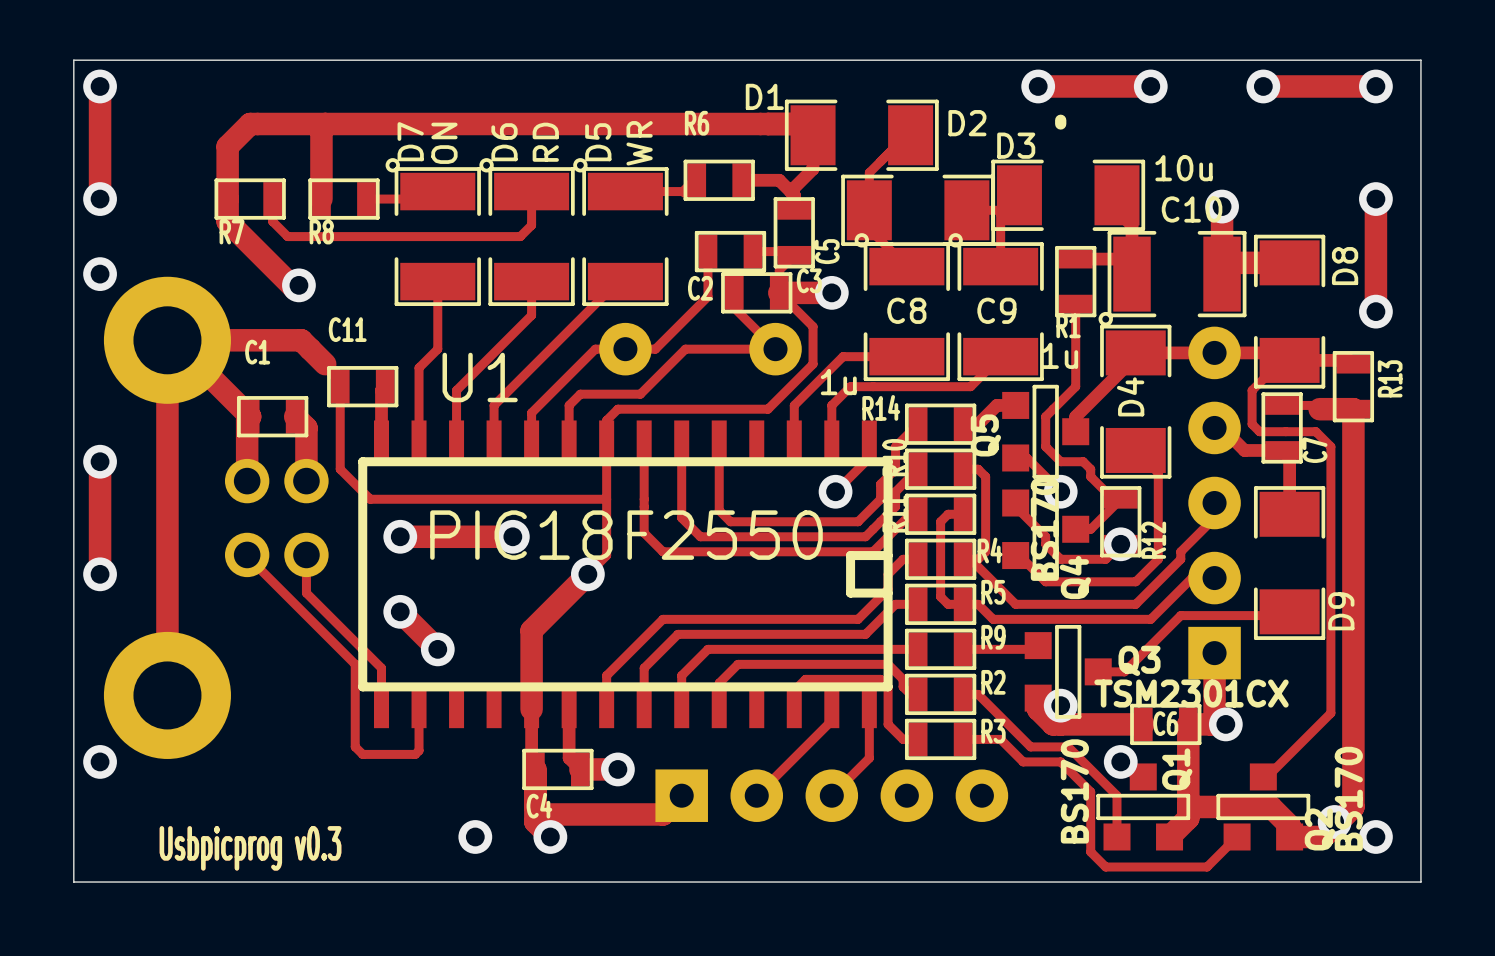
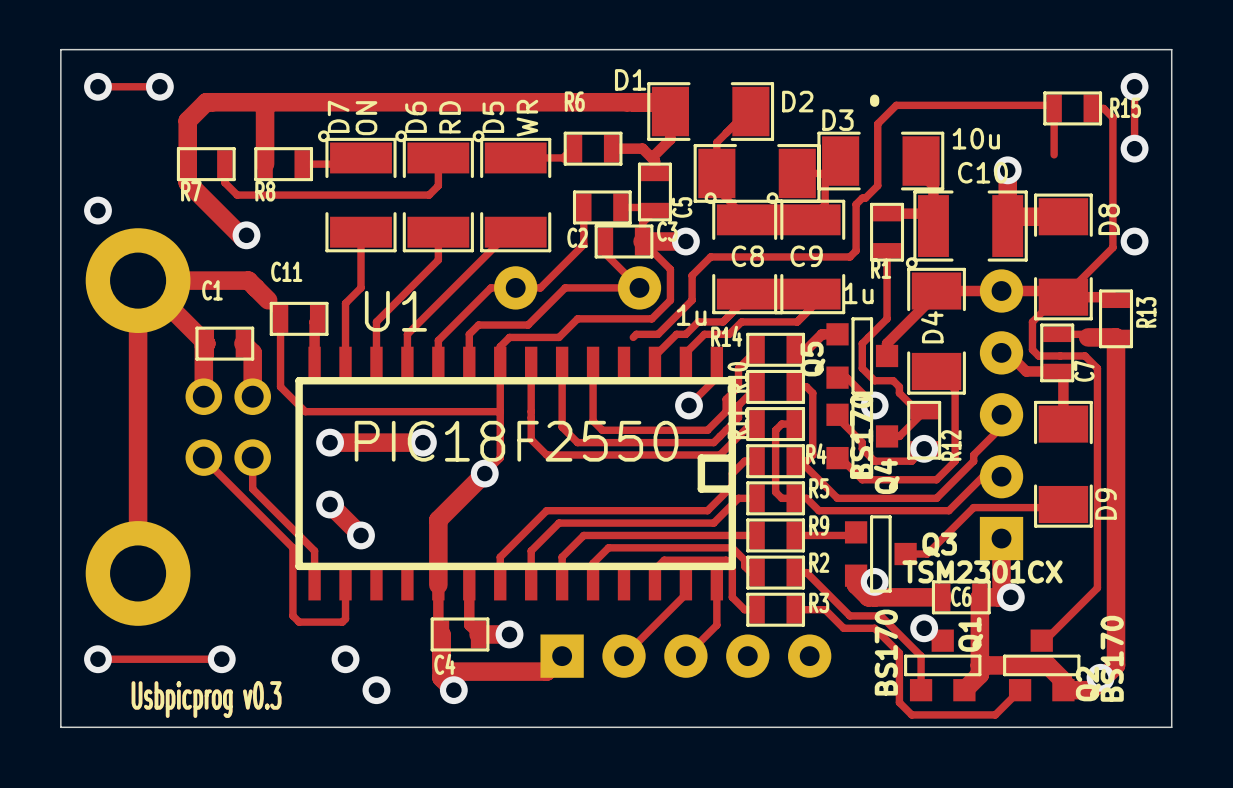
track: (100, 86) (100, 199) -> none
via position: (100, 86) -> (97, 86)
track: (1038, 86) (1150, 86) -> none
via: (1038, 86) -> none
via: (1150, 86) -> none
track: (1263, 86) (1375, 86) -> none
via: (1263, 86) -> none
via position: (1375, 86) -> (1134, 86)
track: none -> (97, 86) (159, 86)
via: none -> (159, 86)
track: none -> (1134, 86) (1134, 148)
R15: none -> (1072, 108)
track: none -> (1091, 108) (1103, 108) (1112, 117) (1112, 247) (1063, 297)
via: (100, 199) -> none
track: (1375, 199) (1375, 311) -> none
via position: (1375, 199) -> (1134, 148)
via position: (100, 274) -> (97, 210)
C9 position: (996, 307) -> (805, 253)
via position: (1375, 311) -> (1134, 241)
track: (906, 356) (843, 356) (794, 405) (794, 431) -> (747, 294) (747, 297) (723, 321) (698, 321)
track: (790, 386) (771, 405) -> (1054, 154) (1054, 108) (1051, 105) (896, 105) (877, 123) (877, 185) (856, 204) (856, 250) (849, 256) (710, 256) (692, 275) (692, 300) (658, 334) (636, 334)
track: (970, 386) (850, 386) (846, 390) -> (800, 318) (797, 321) (741, 321) (729, 334) (704, 334) (685, 352)
track: (831, 405) (831, 427) -> (685, 334) (676, 334) (654, 355)
track: (677, 409) (768, 409) -> (559, 337) (577, 318) (651, 318)
track: (100, 461) (100, 574) -> none
via: (100, 461) -> none
via: (100, 574) -> none
via position: (100, 761) -> (97, 659)
track: none -> (97, 659) (221, 659)
via: none -> (221, 659)
via: none -> (345, 659)
via position: (475, 836) -> (376, 690)
via: (1375, 836) -> none

